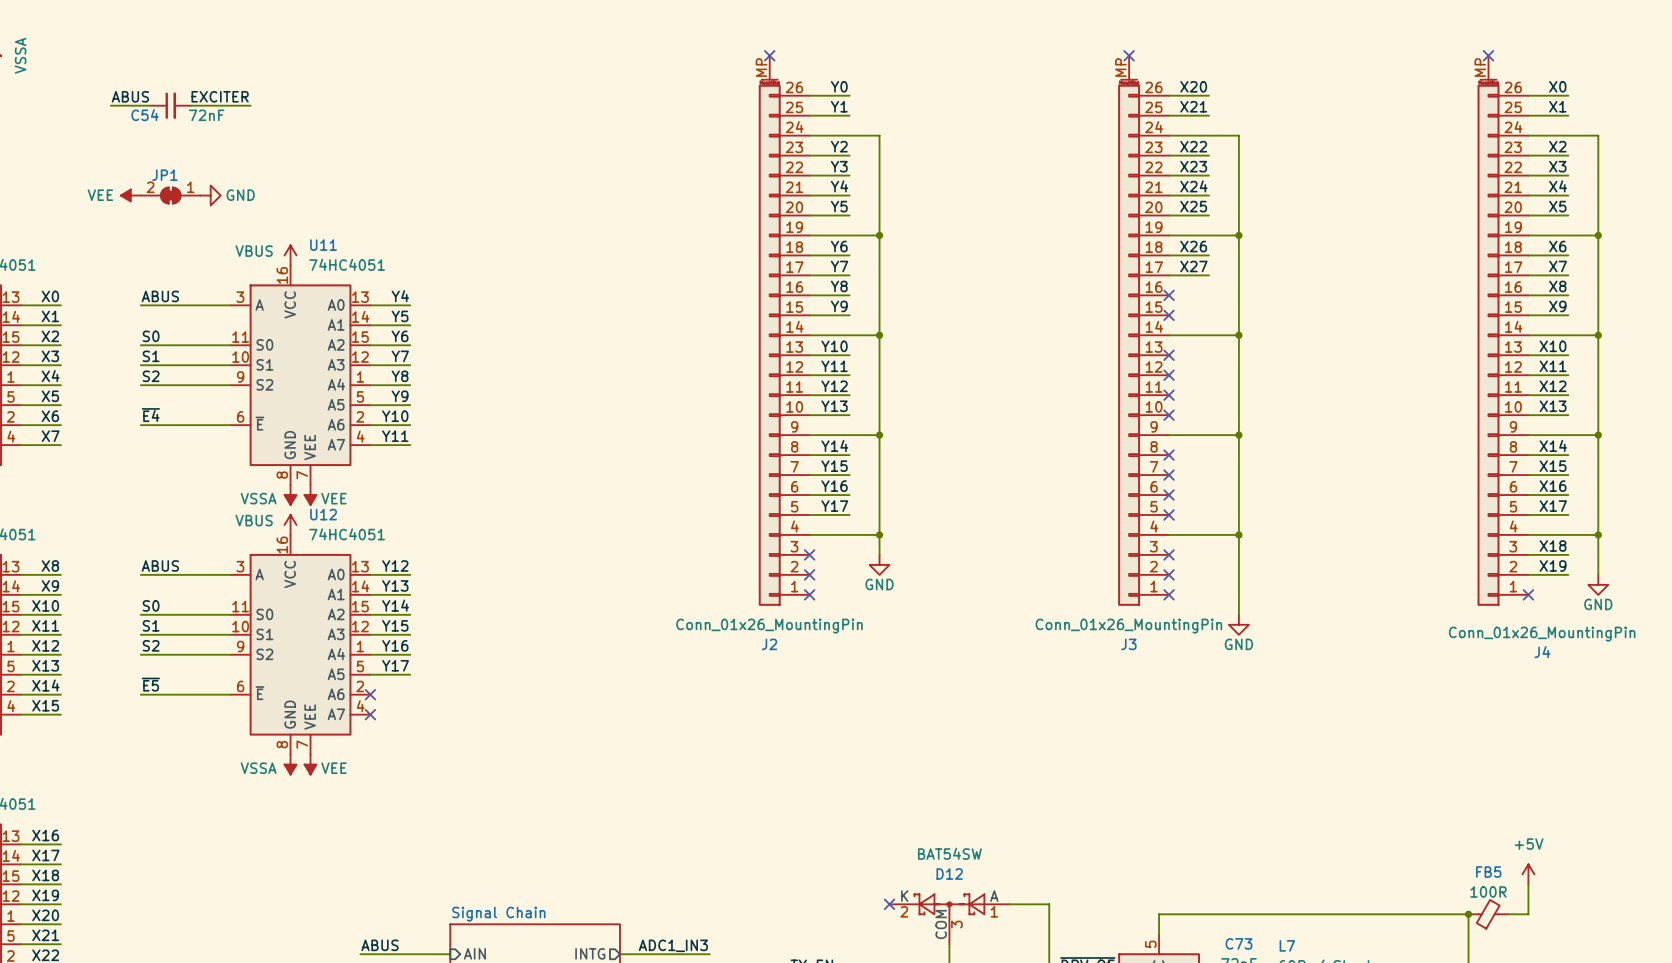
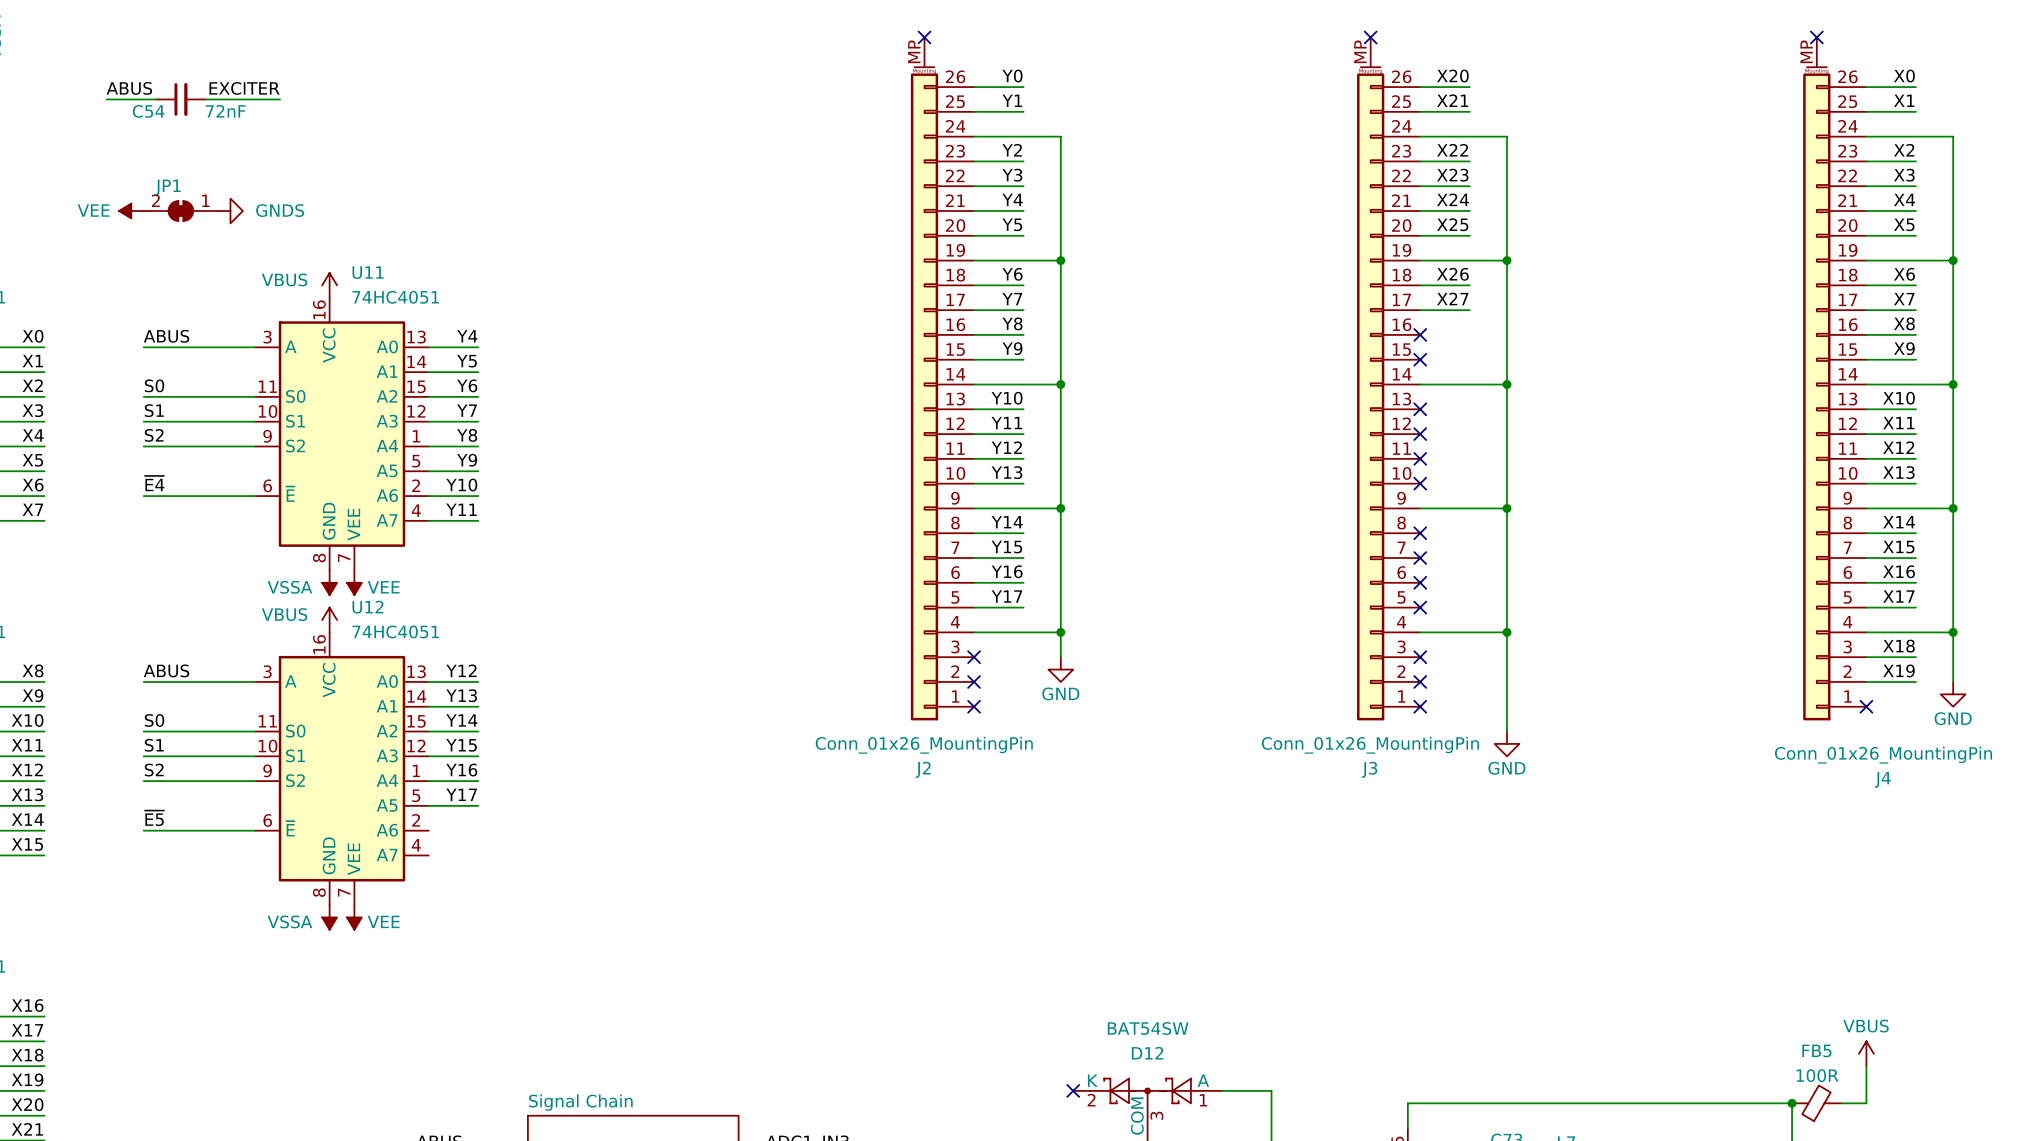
power symbol: GND (210, 195) -> GNDS (230, 211)
no-connect mark: (370, 694) -> none
no-connect mark: (370, 714) -> none
power symbol: +5V (1528, 874) -> VBUS (1866, 1053)

